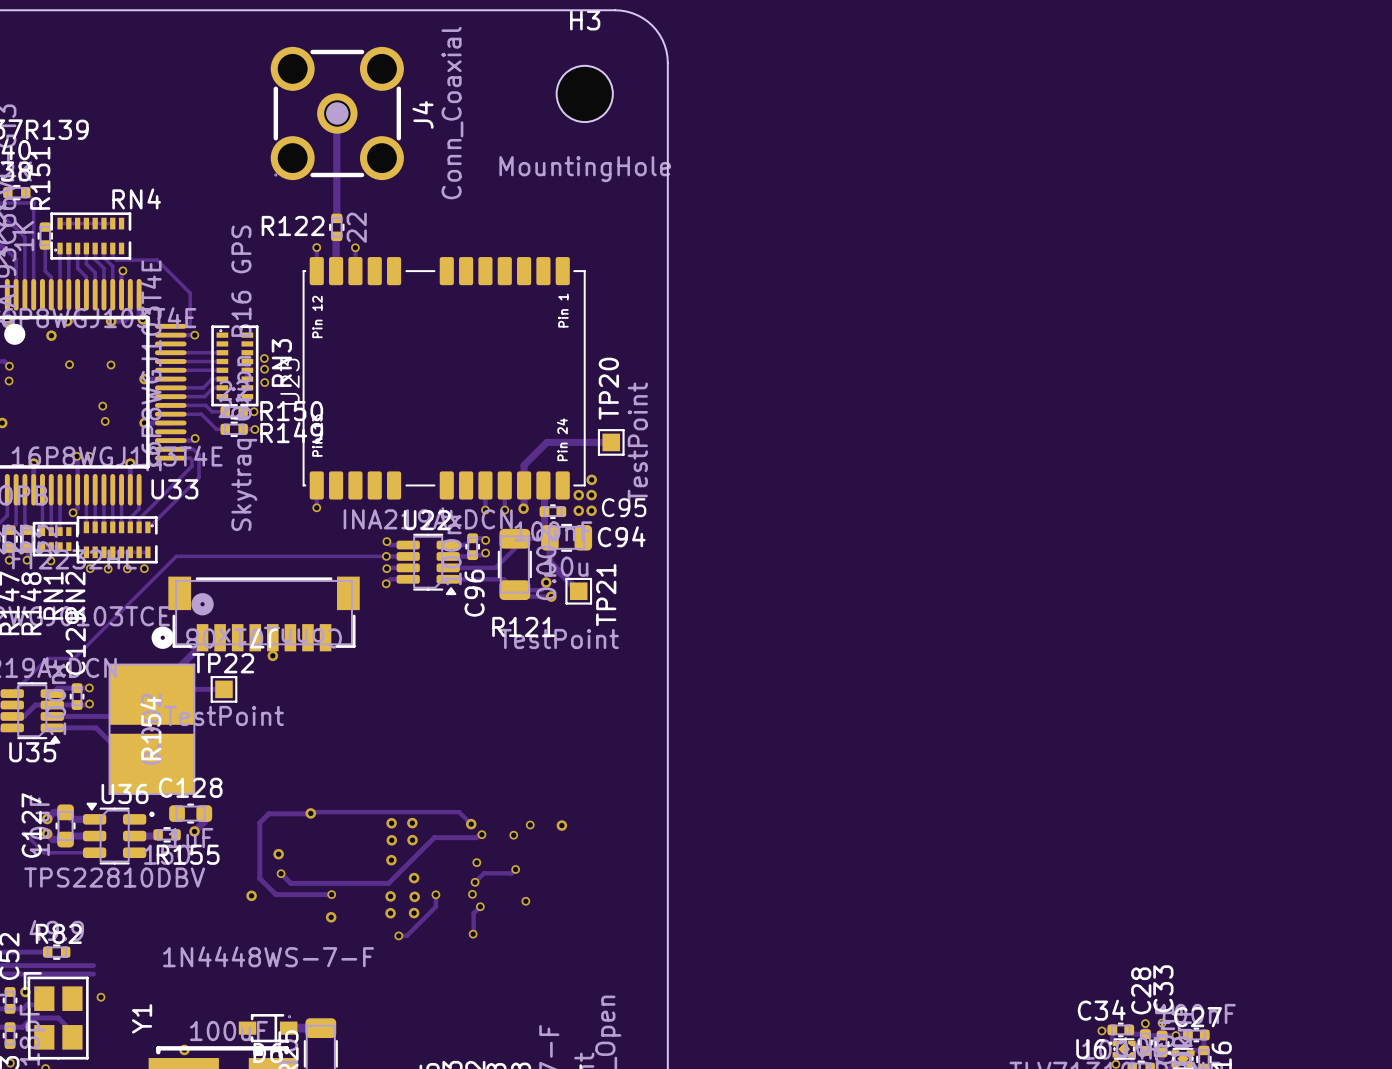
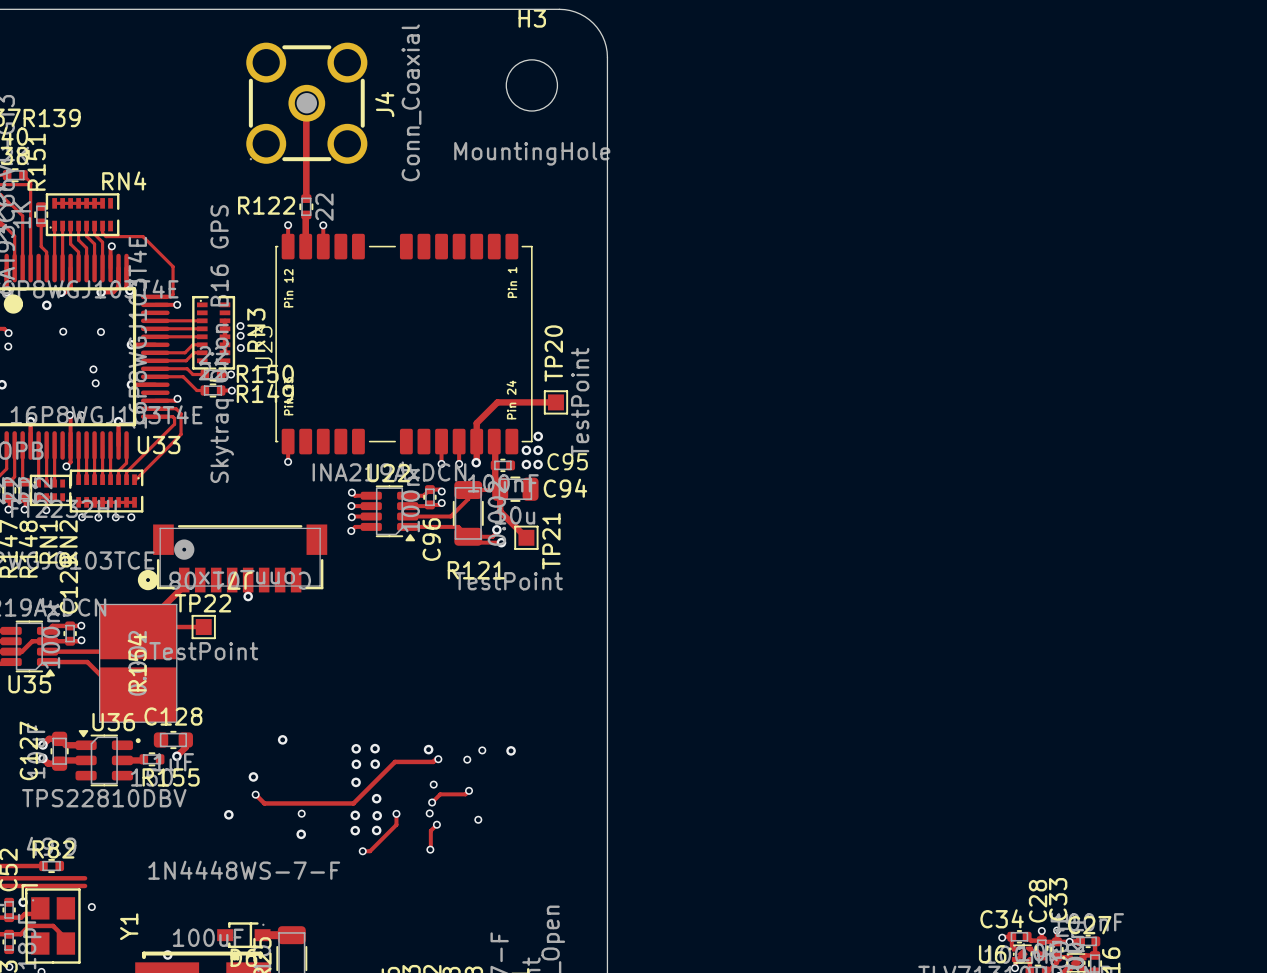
track: (386, 556) (176, 556) (74, 658) (47, 658) (12, 693) -> none
track: (471, 824) (459, 812) (268, 813) (259, 822) (259, 878) (275, 894) (331, 894) -> none
track: (24, 833) (43, 852) (94, 852) -> none

